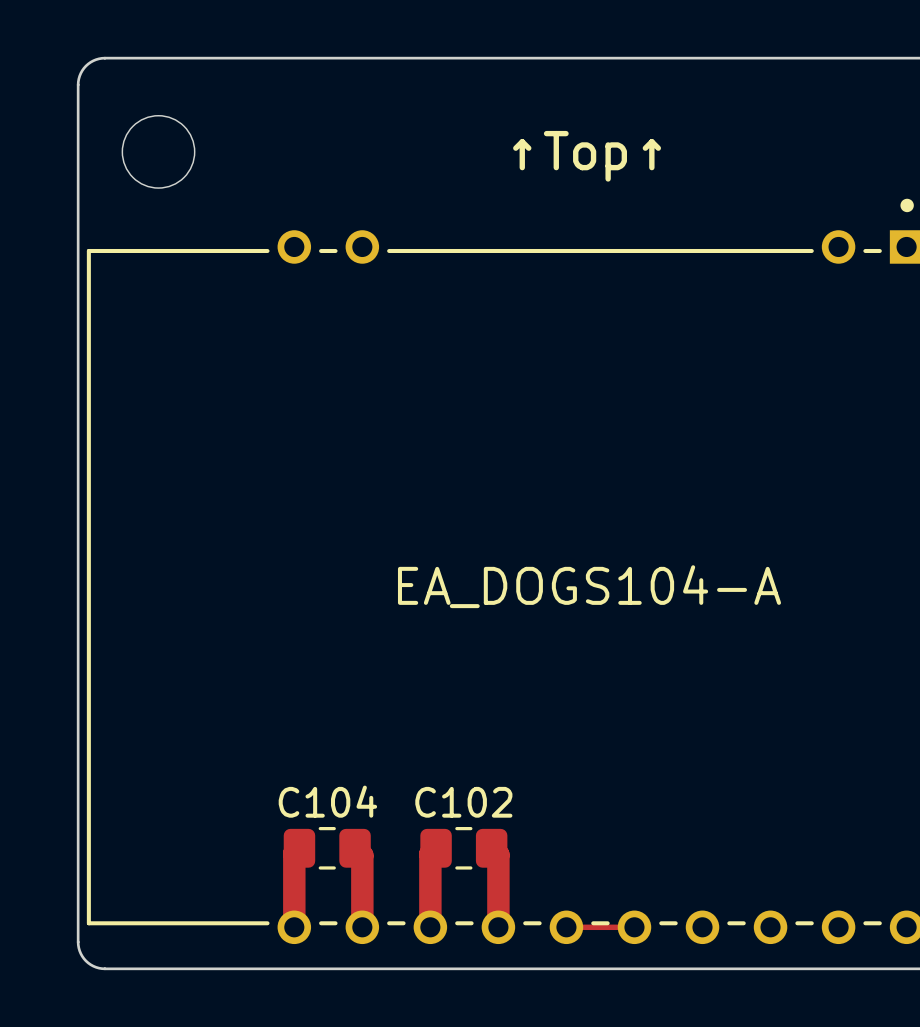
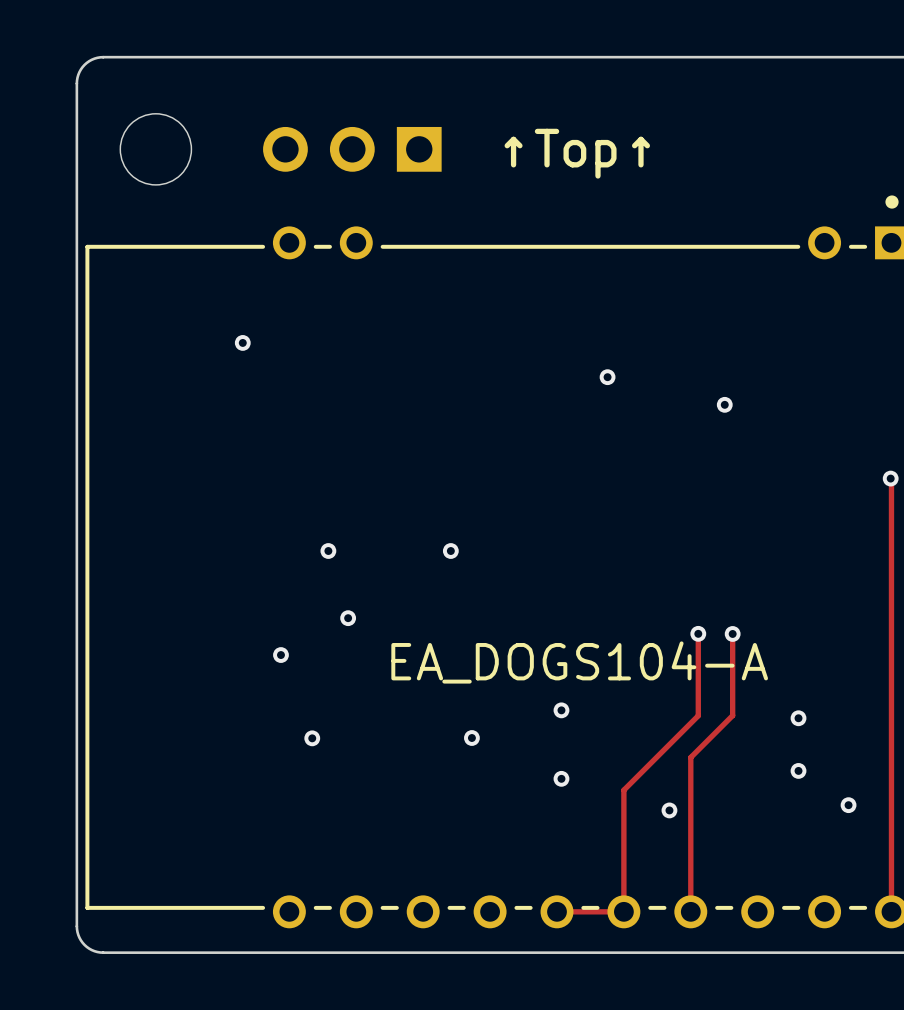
part: none -> (352, 149)
via: none -> (242, 342)
via: none -> (607, 377)
via: none -> (724, 404)
track: none -> (890, 478) (891, 911)
via: none -> (890, 478)
via: none -> (328, 551)
via: none -> (450, 551)
part value position: EA_DOGS104-A (589, 586) -> EA_DOGS104-A (579, 662)
via: none -> (348, 618)
track: none -> (698, 633) (698, 715) (623, 790) (623, 911)
via: none -> (698, 633)
track: none -> (732, 633) (732, 715) (690, 757) (690, 911)
via: none -> (732, 633)
via: none -> (280, 655)
via: none -> (561, 710)
via: none -> (798, 718)
via: none -> (312, 738)
via: none -> (471, 738)
via: none -> (798, 770)
via: none -> (561, 778)
via: none -> (848, 805)
via: none -> (669, 810)
track: (299, 848) (294, 853) (294, 927) -> none
C104: (327, 848) -> none
track: (355, 848) (362, 855) (362, 927) -> none
track: (436, 848) (430, 853) (430, 927) -> none
C102: (463, 848) -> none
track: (491, 848) (498, 855) (498, 927) -> none

